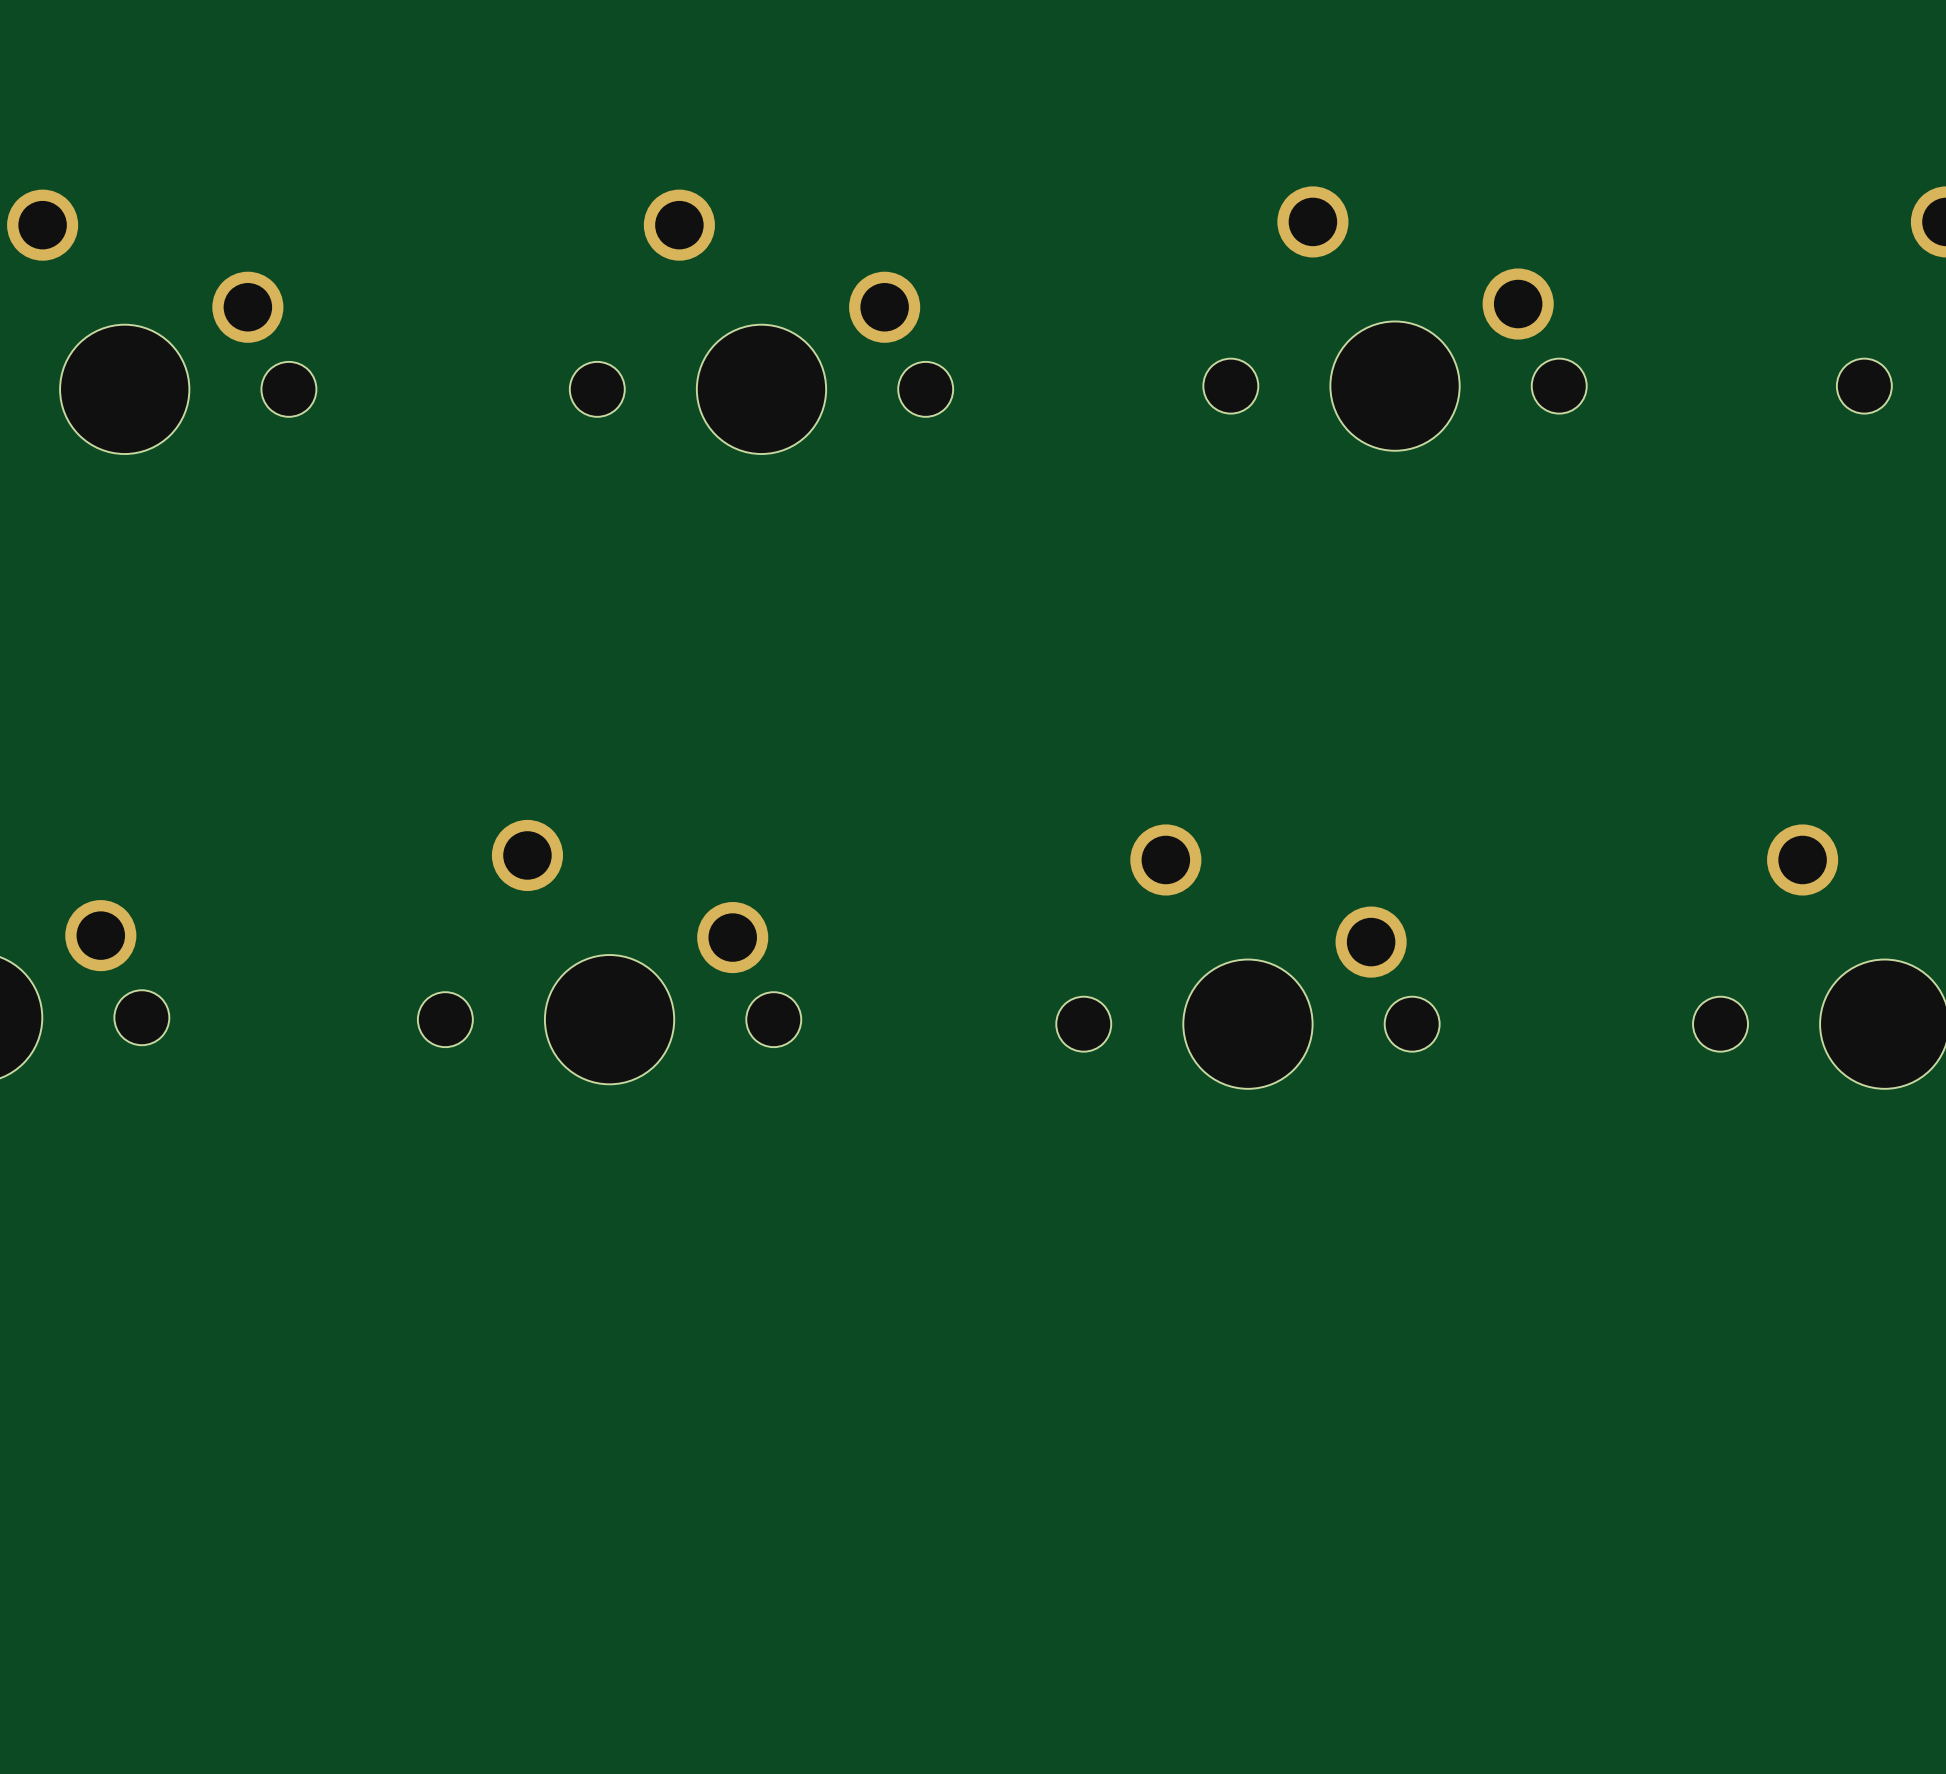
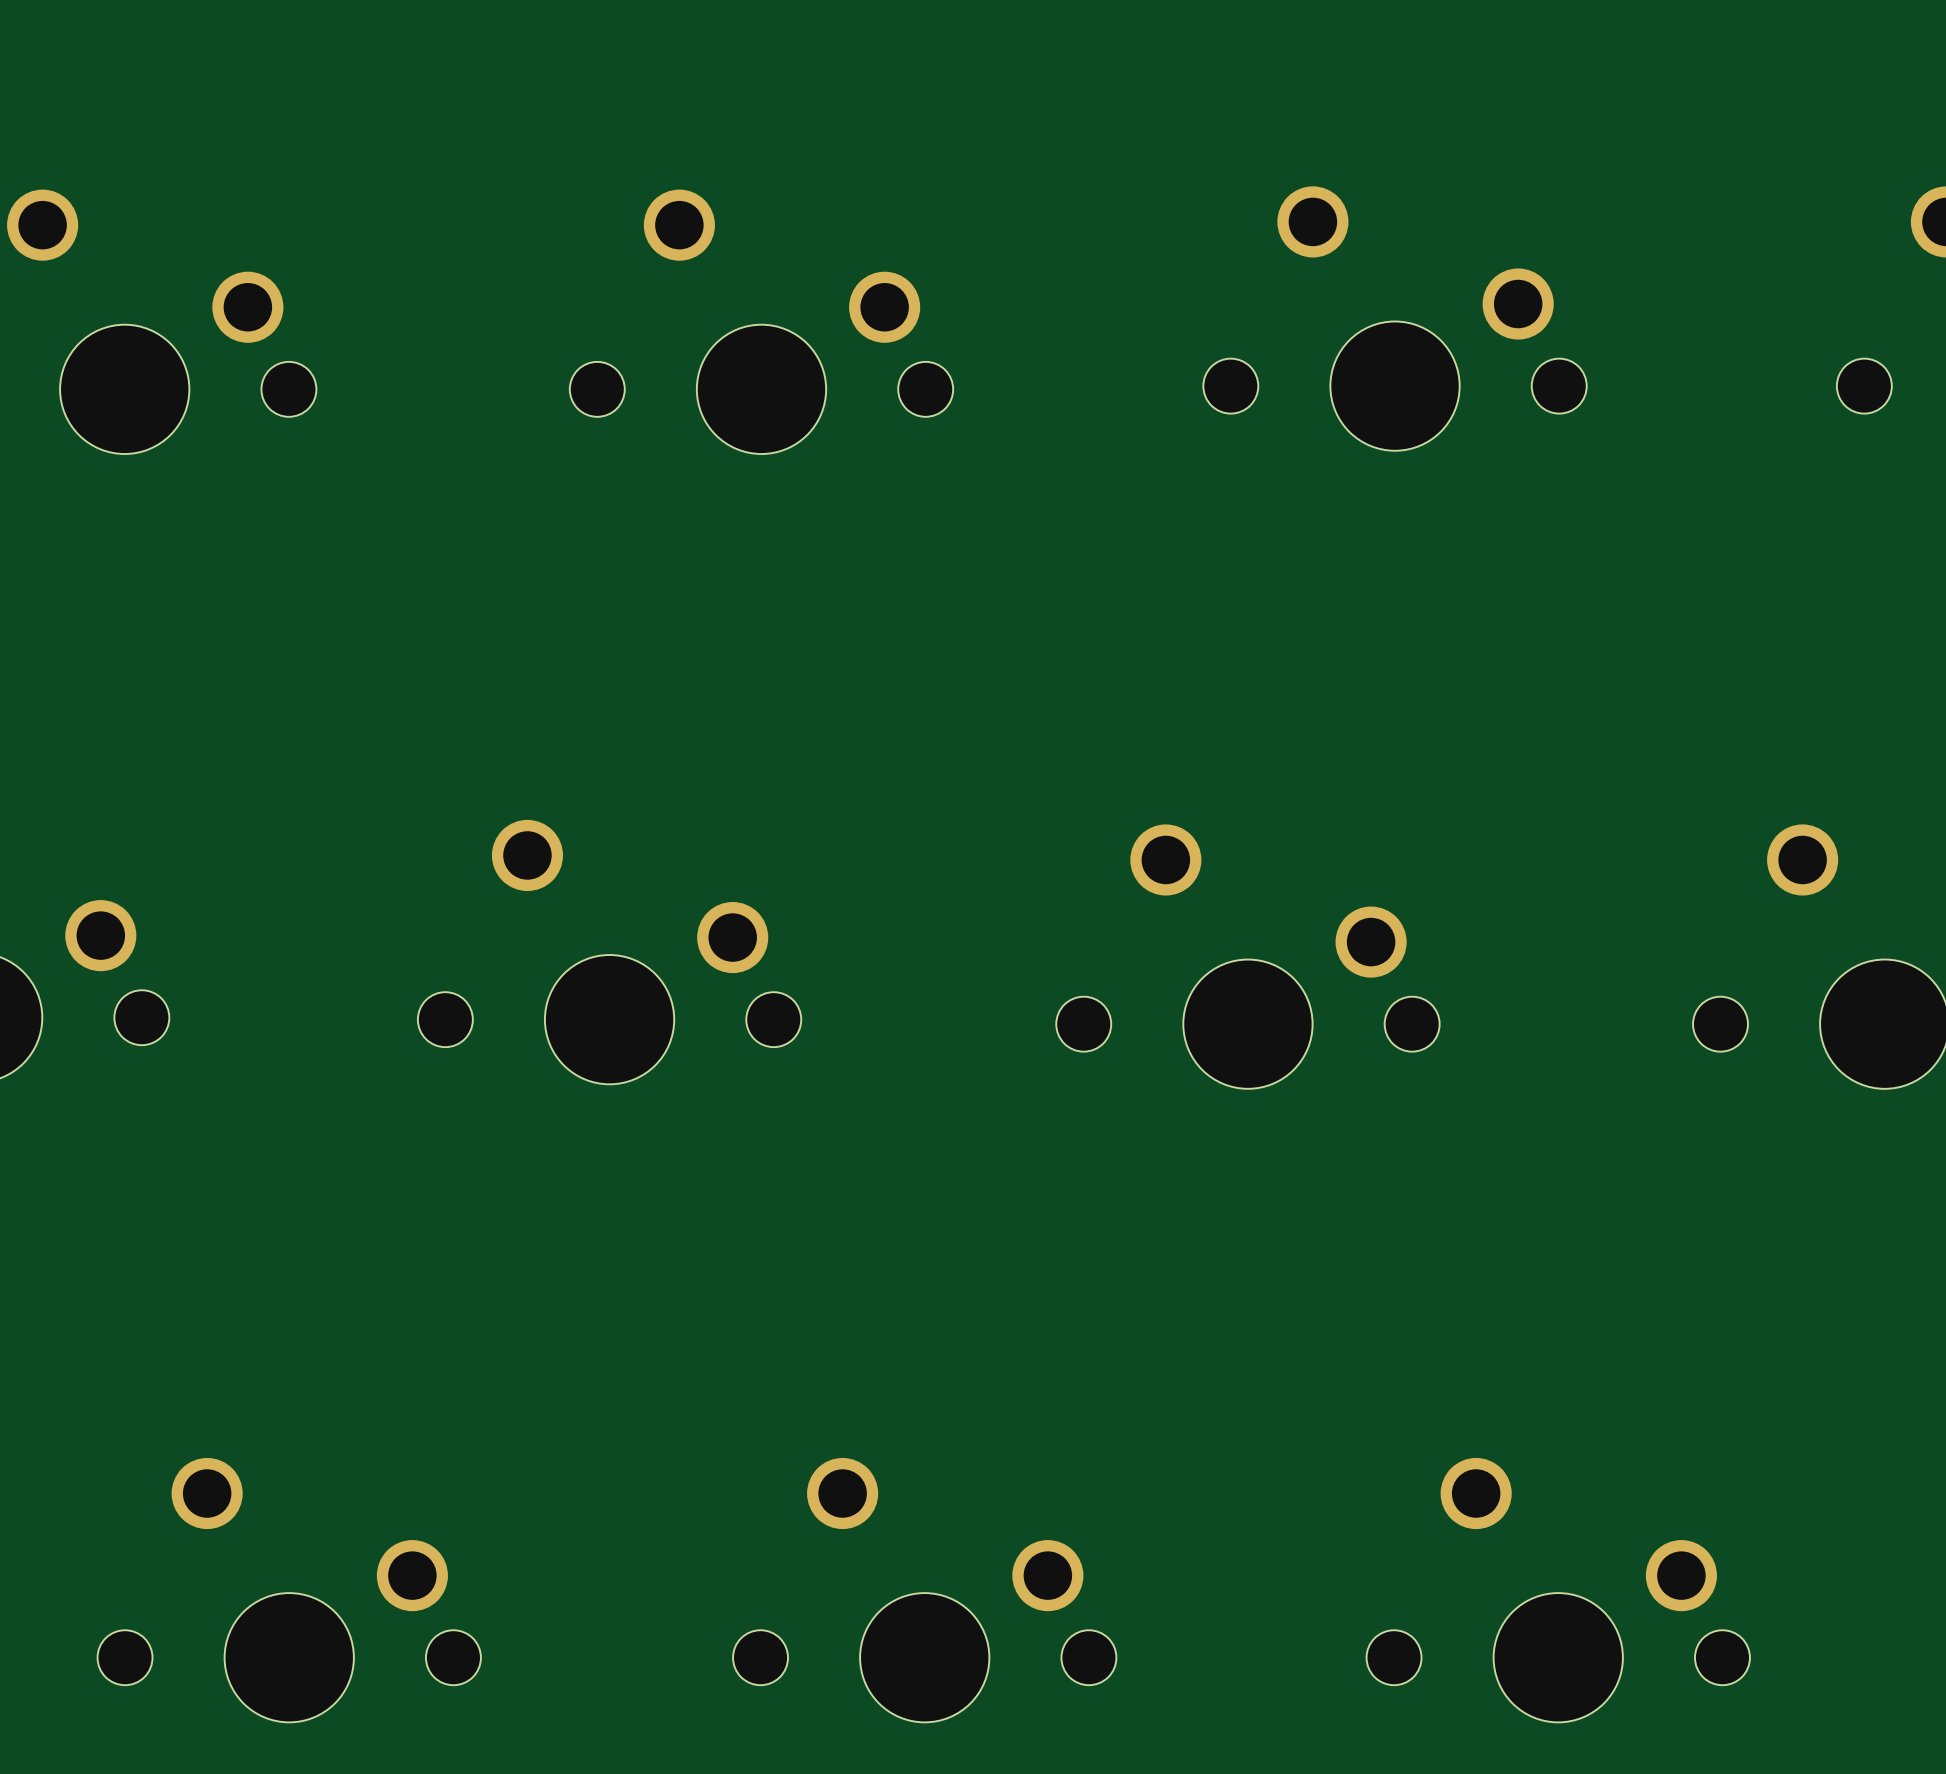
part: none -> (289, 1590)
part: none -> (924, 1590)
part: none -> (1558, 1590)

